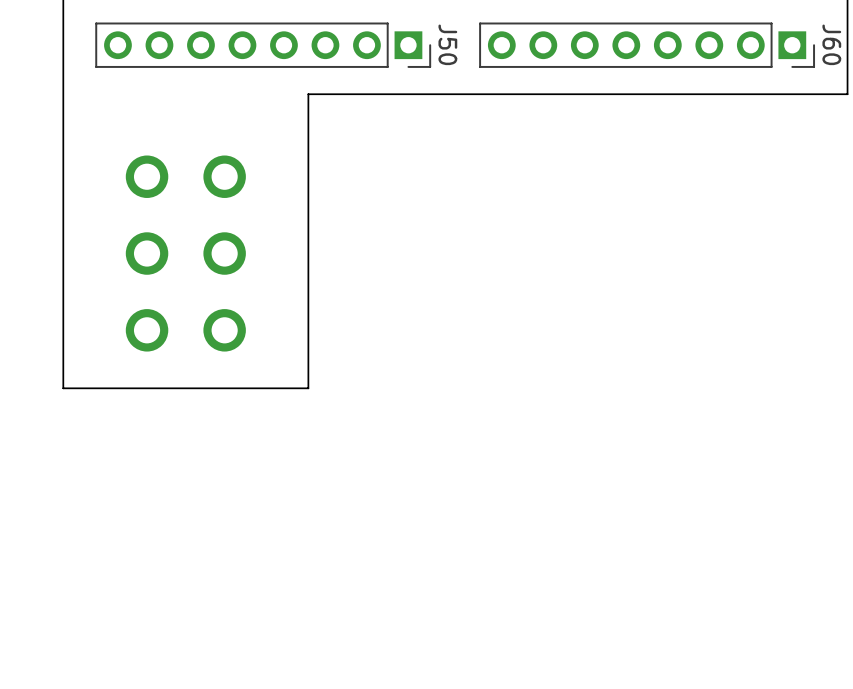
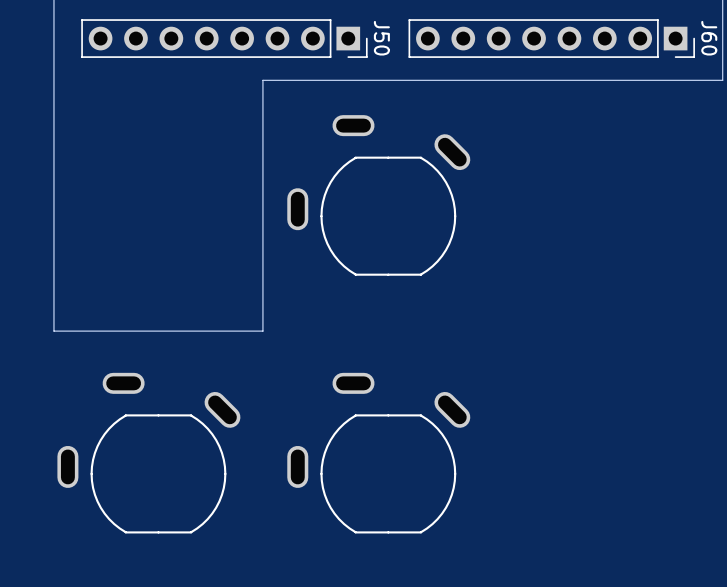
part: none -> (378, 195)
part: (185, 253) -> none
part: none -> (148, 453)
part: none -> (378, 453)

